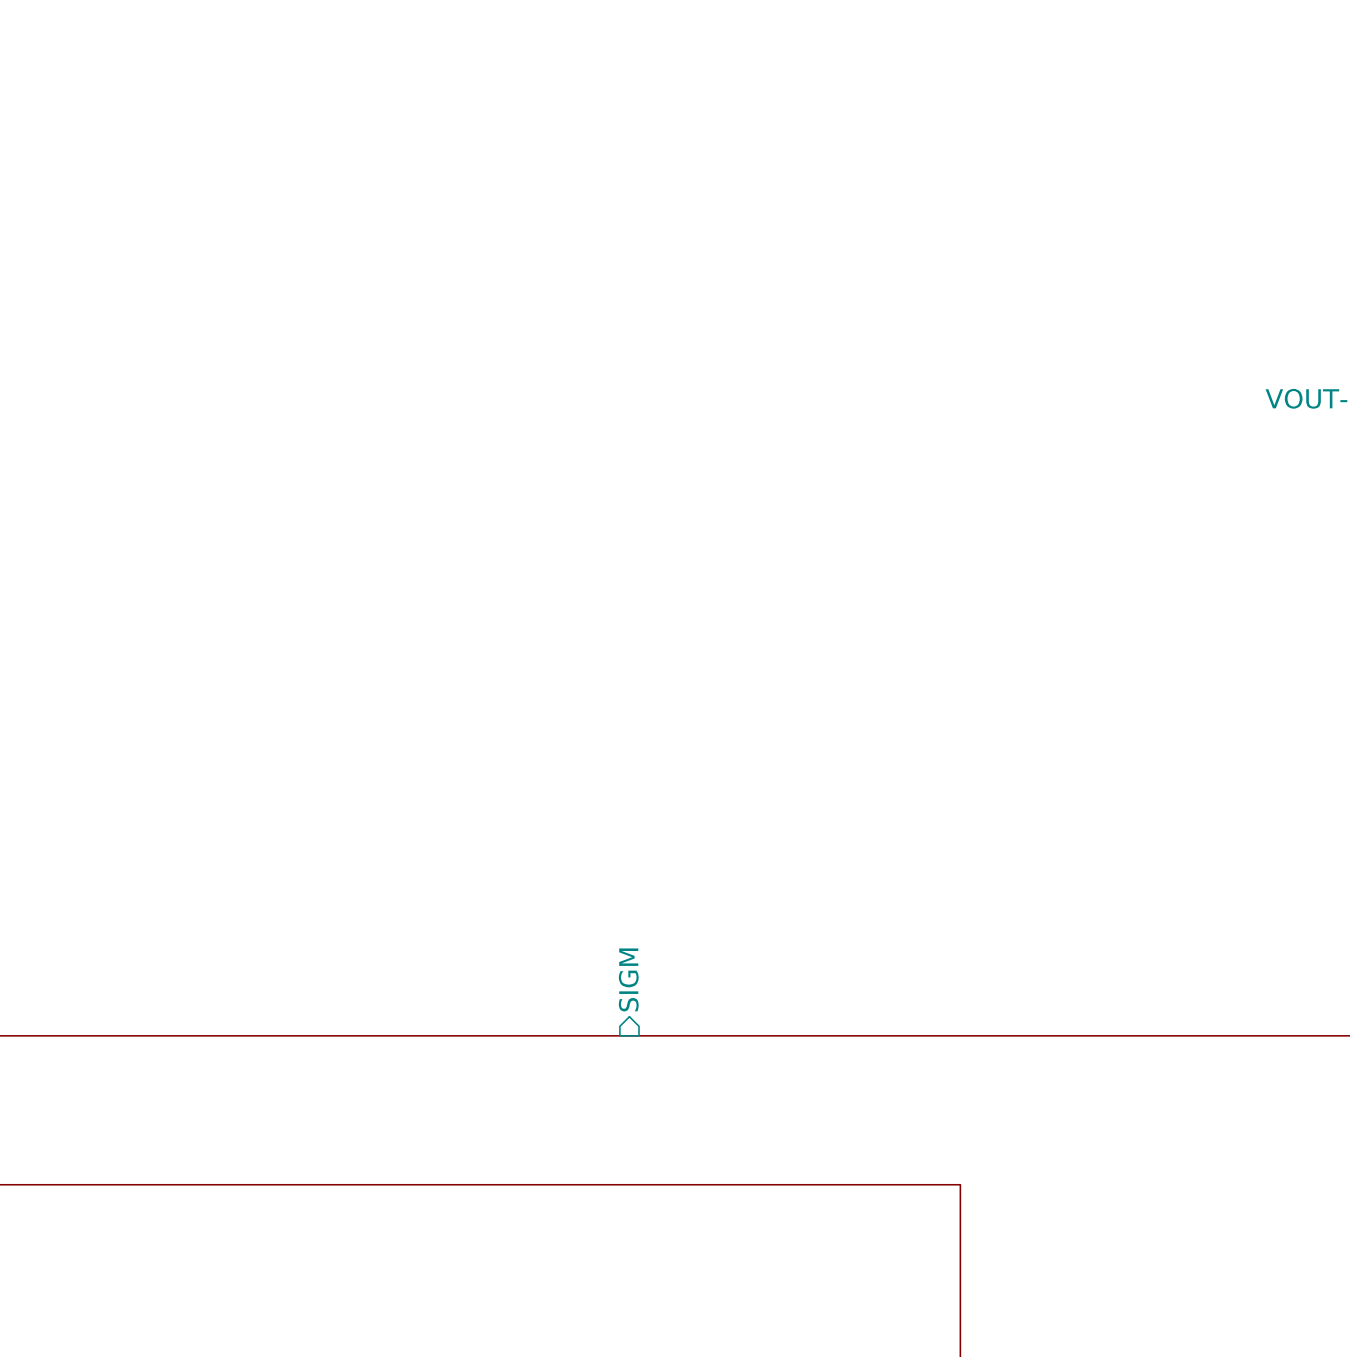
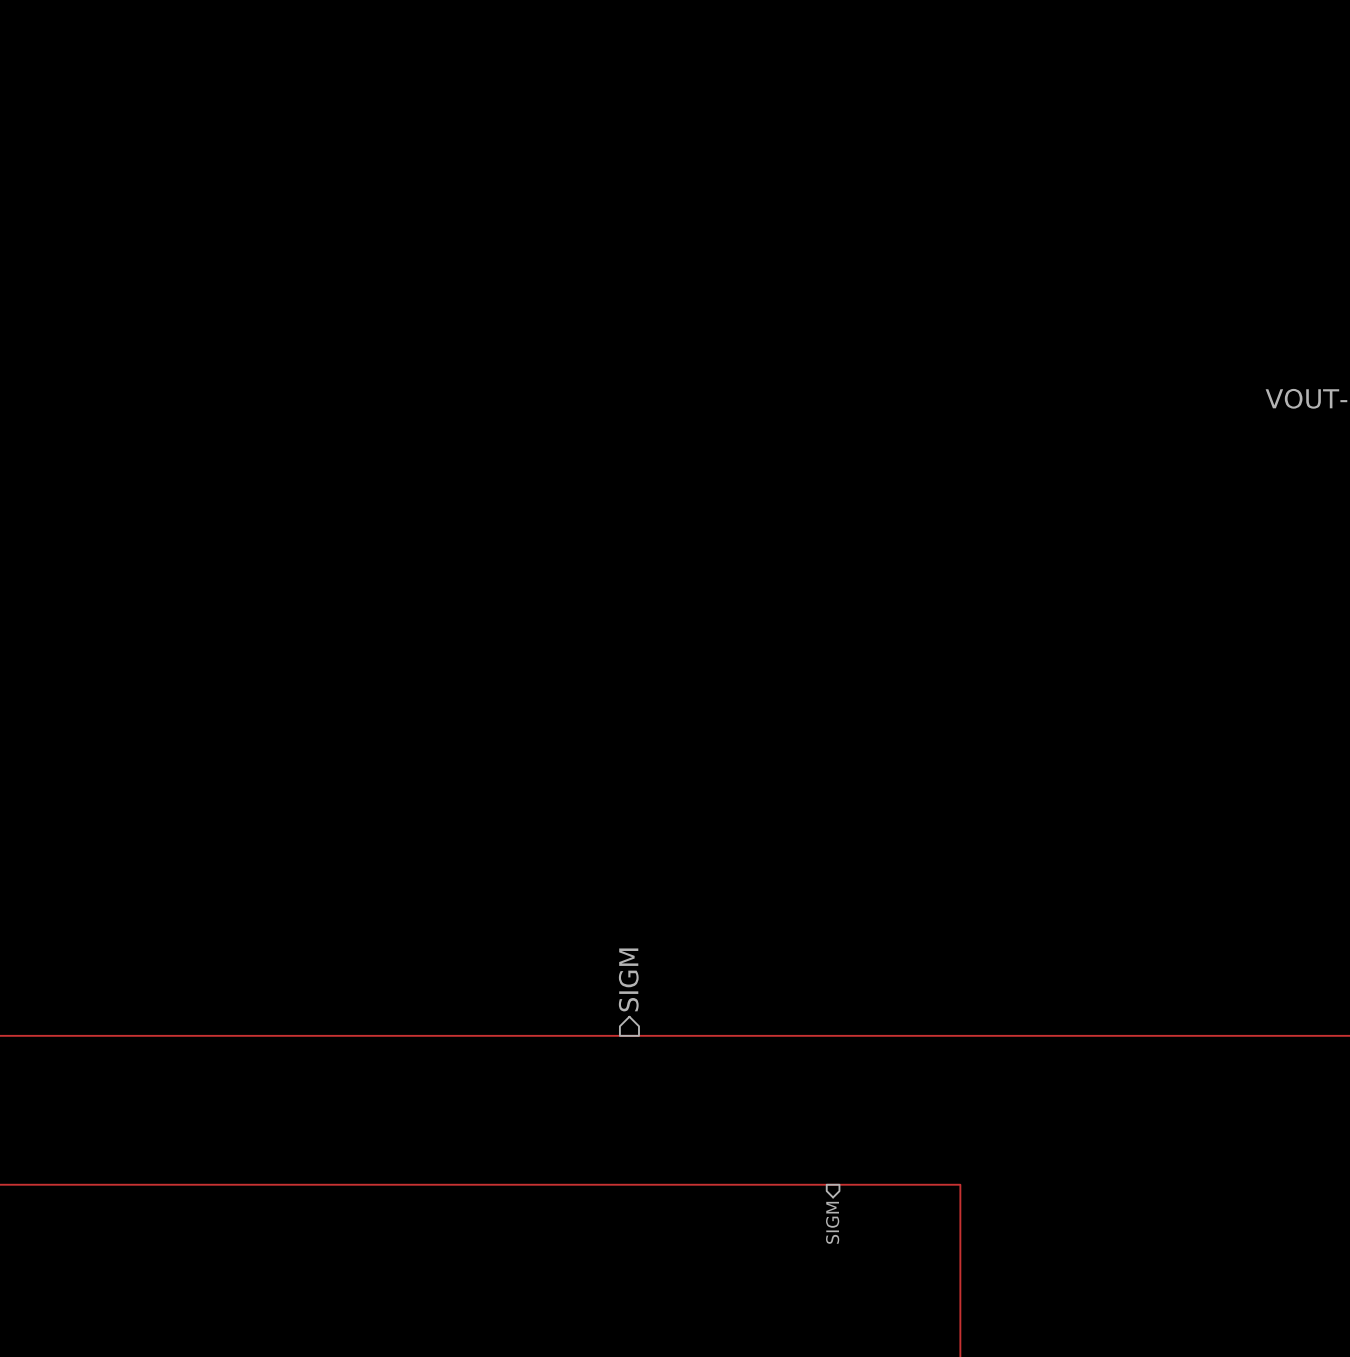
sheet pin: none -> SIGM (832, 1222)

